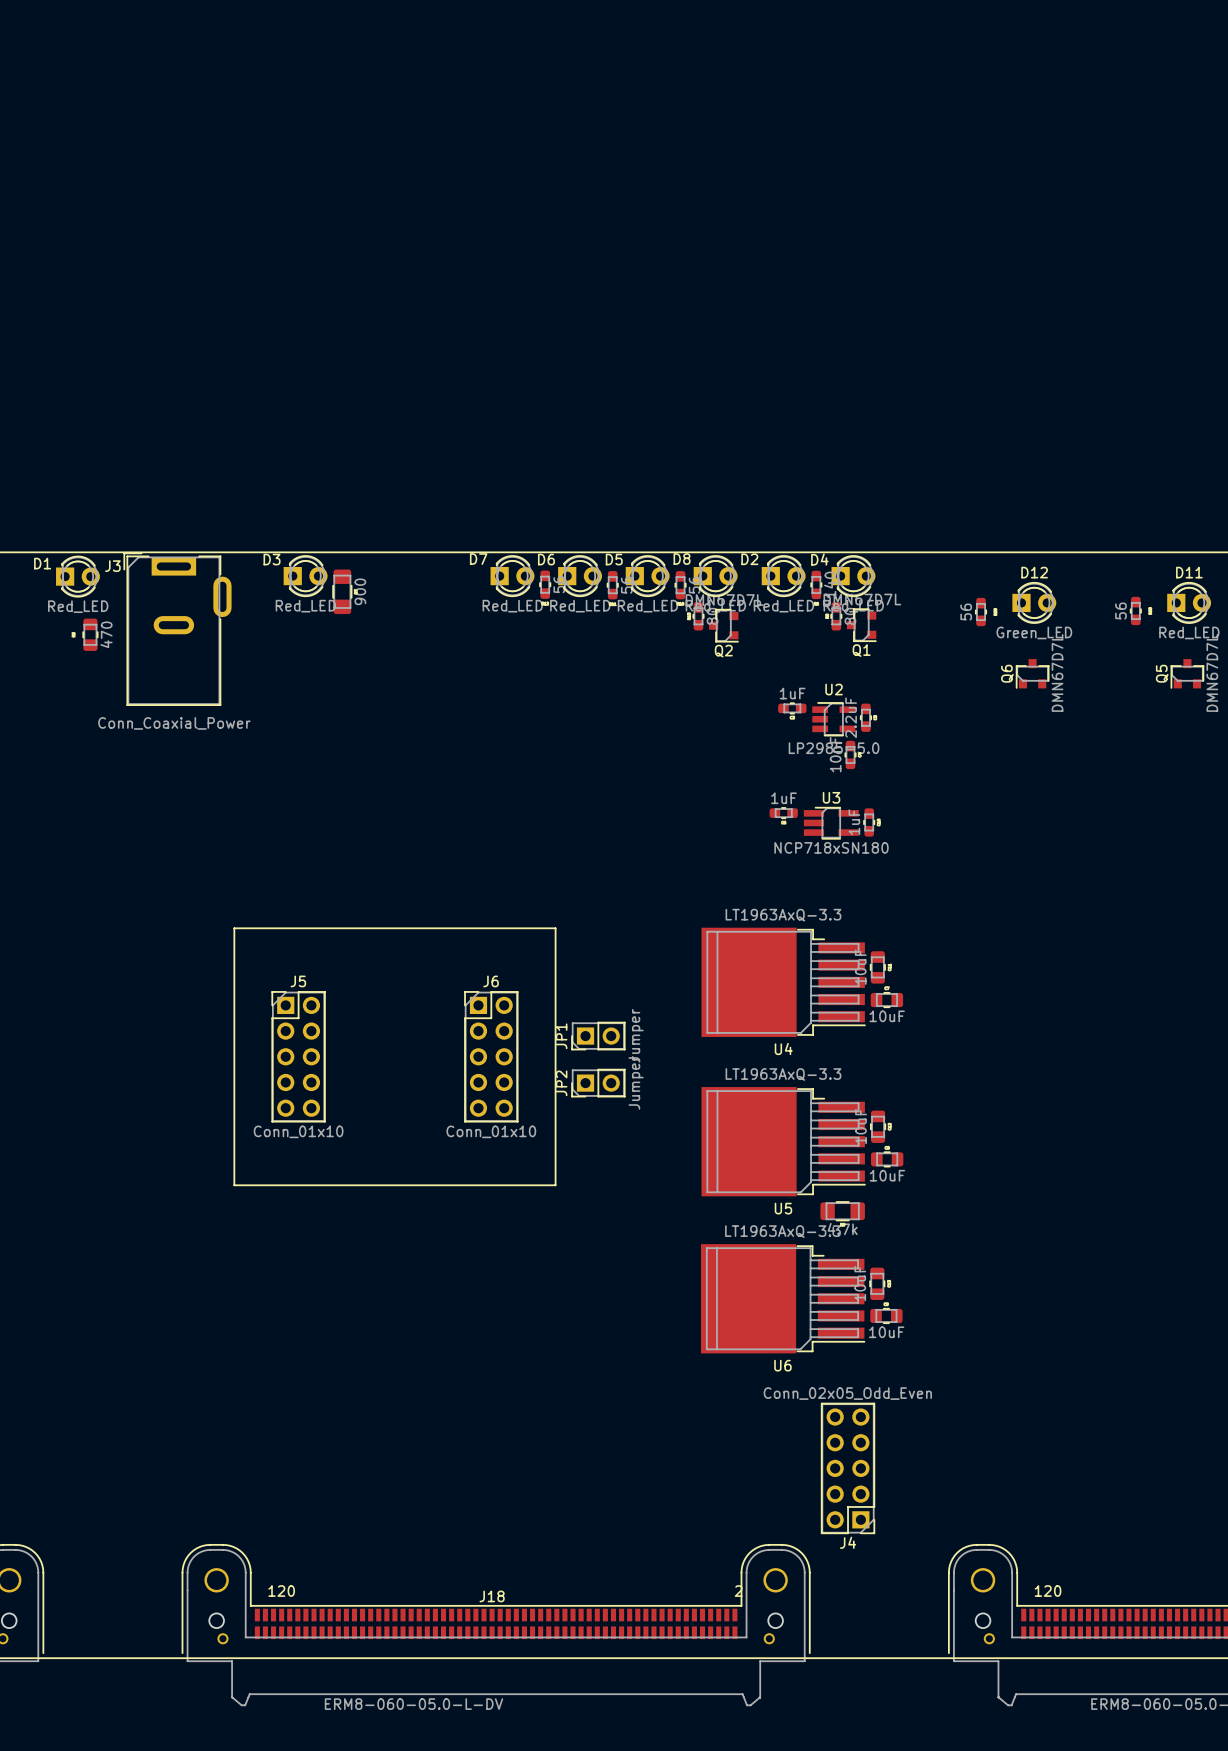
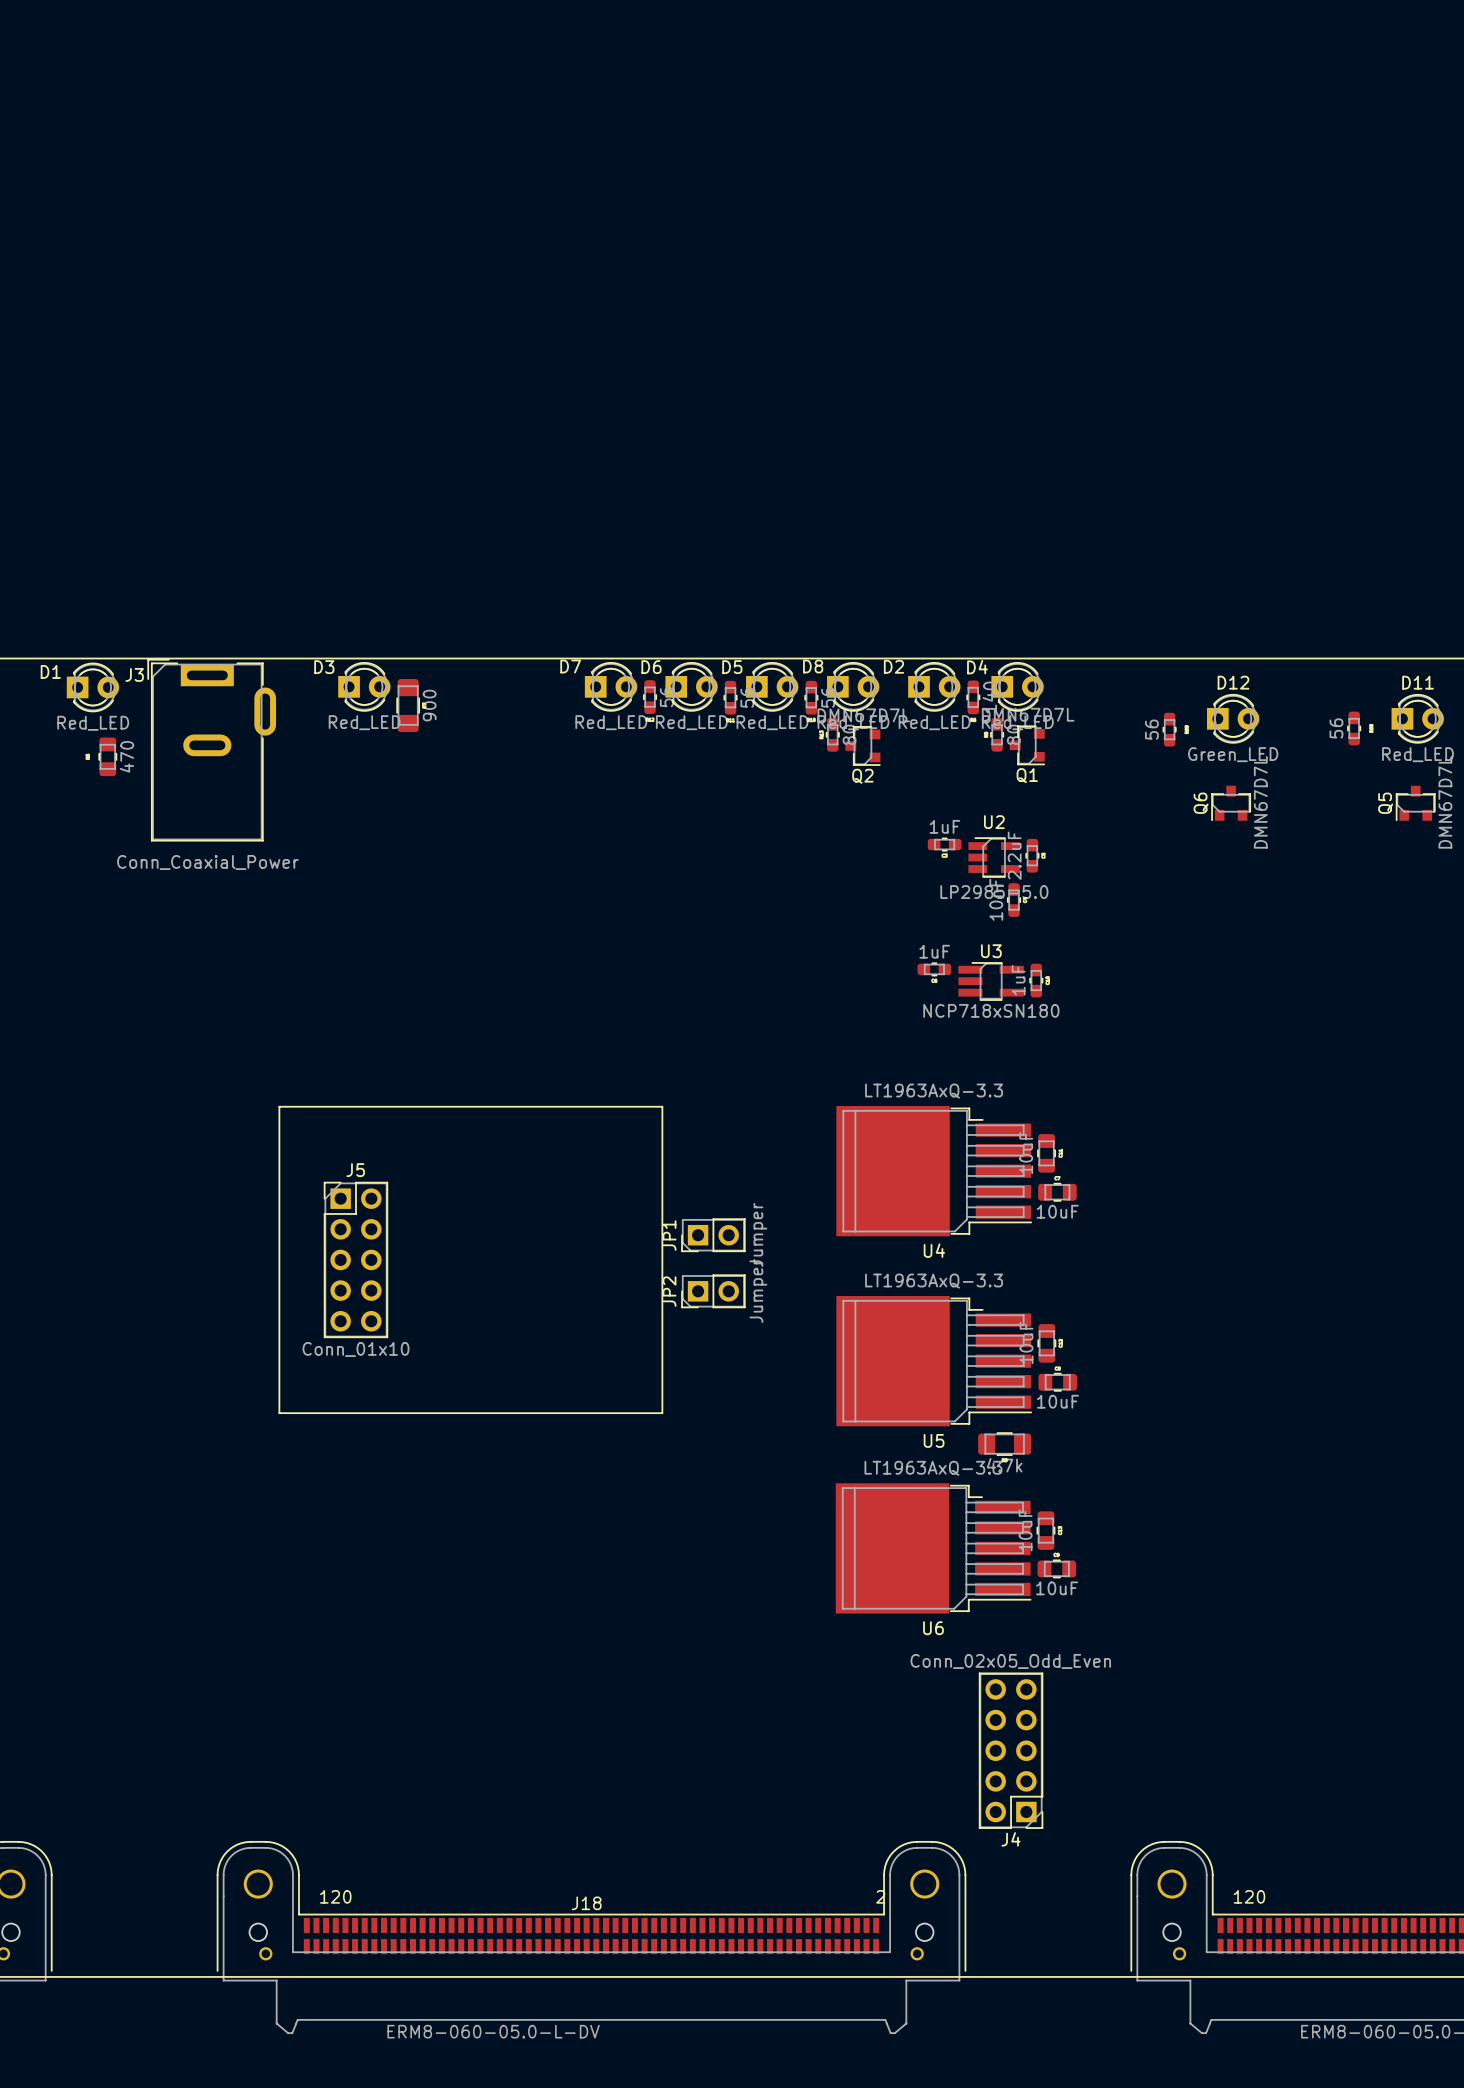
J6: Conn_01x10 (491, 1056) -> none

